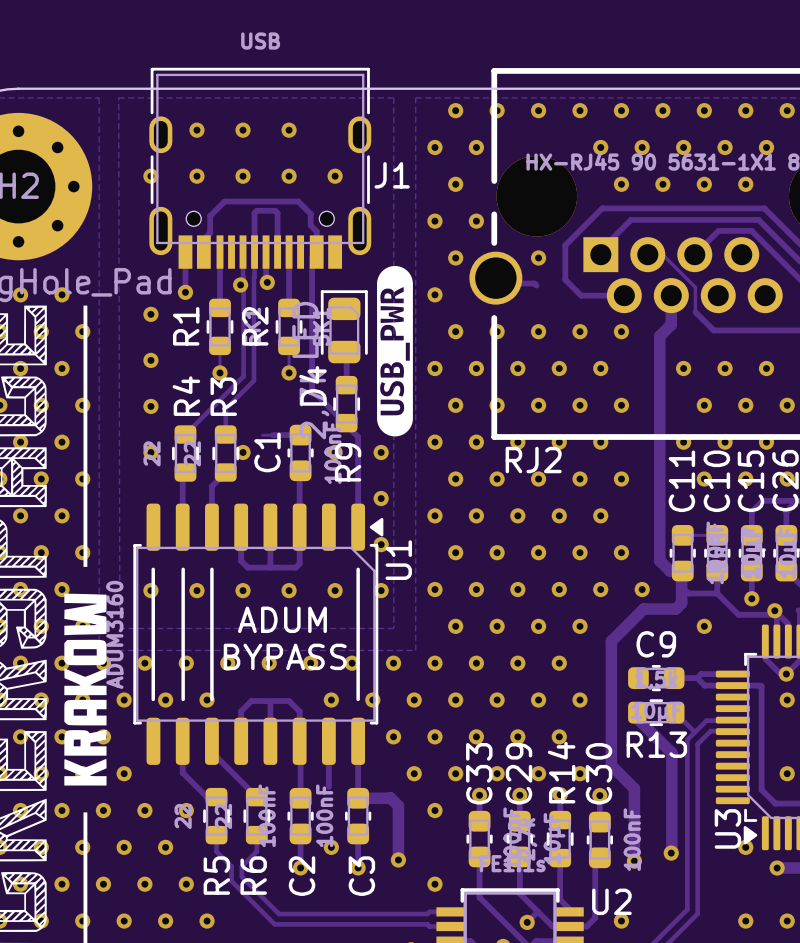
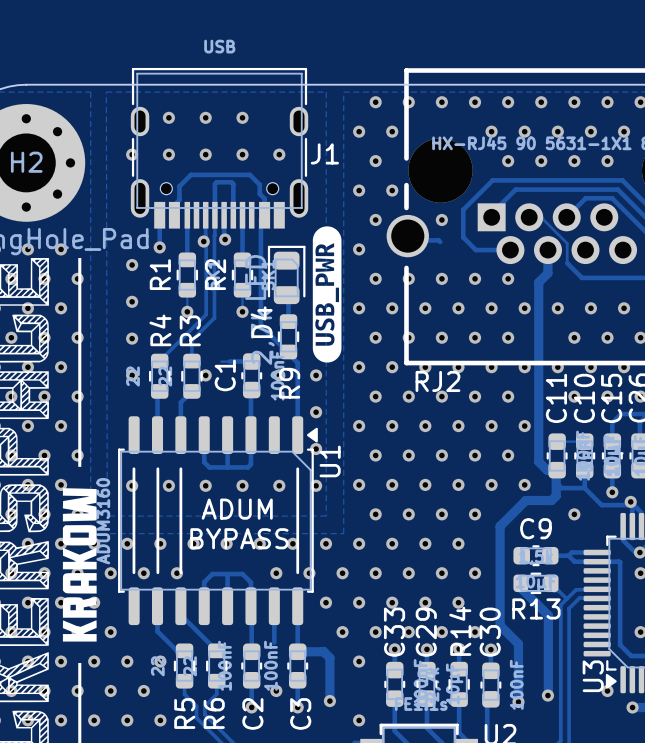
via: none -> (524, 308)
via: none -> (524, 367)
via: none -> (524, 426)

